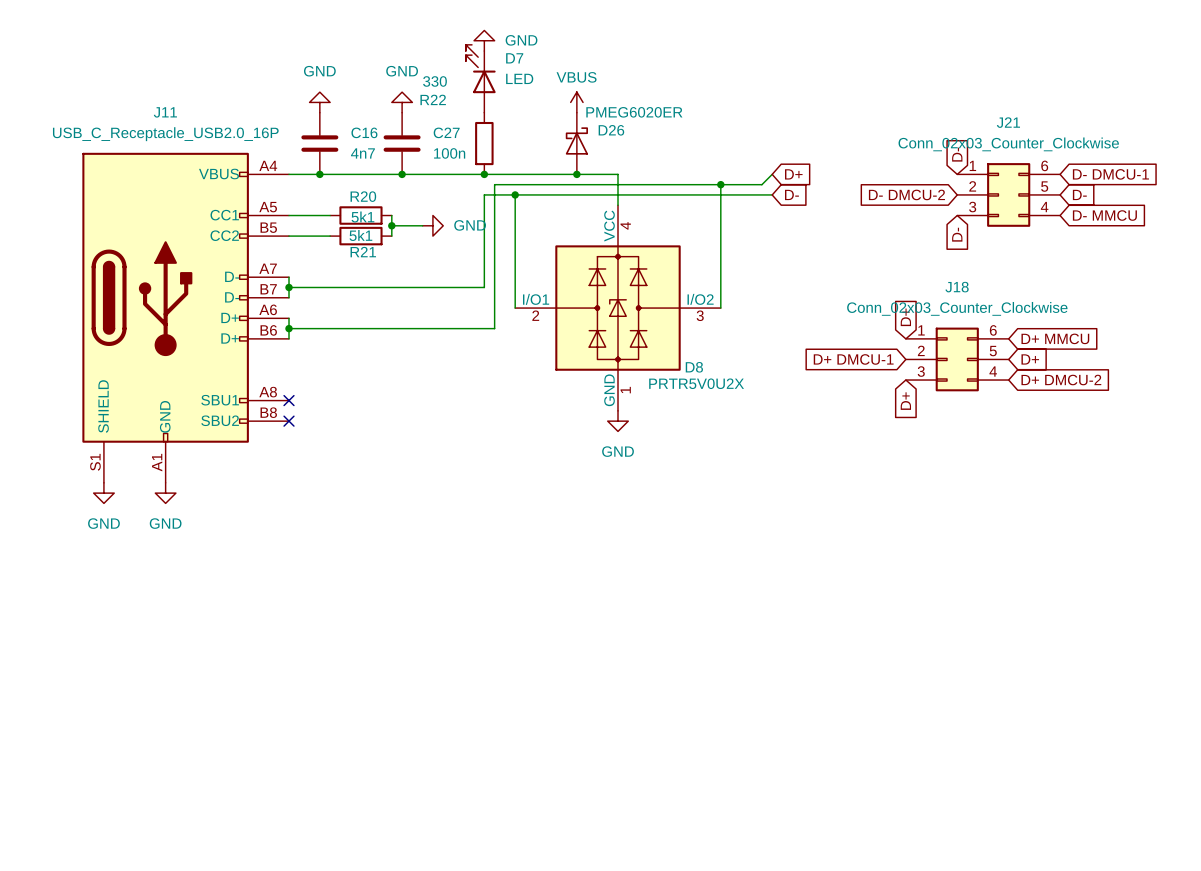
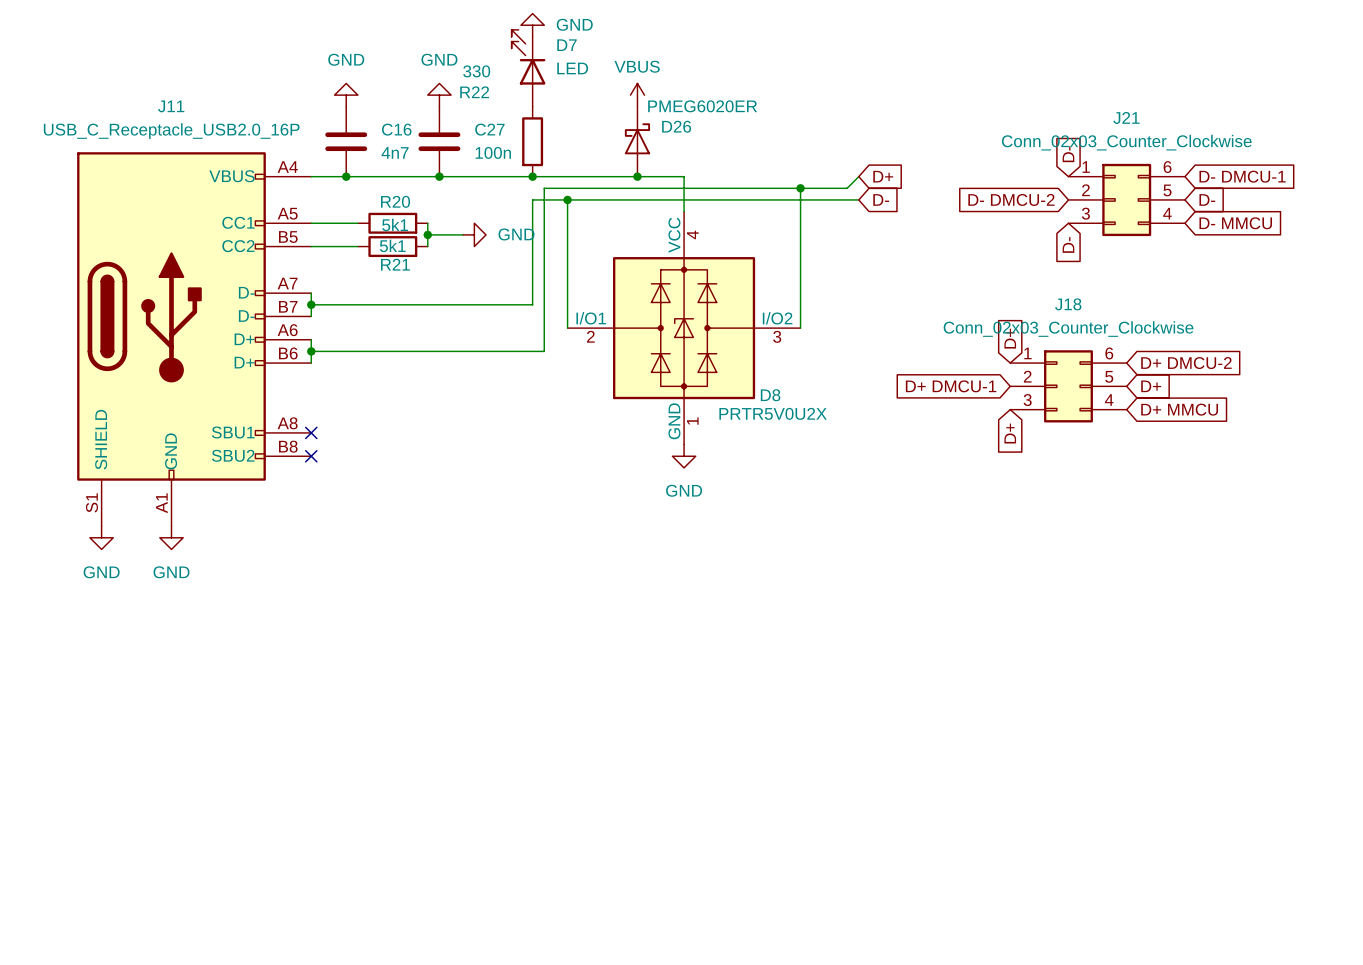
global label: D+ MMCU (1055, 338) -> D+ DMCU-2 (1186, 363)
global label: D+ DMCU-2 (1061, 380) -> D+ MMCU (1179, 409)

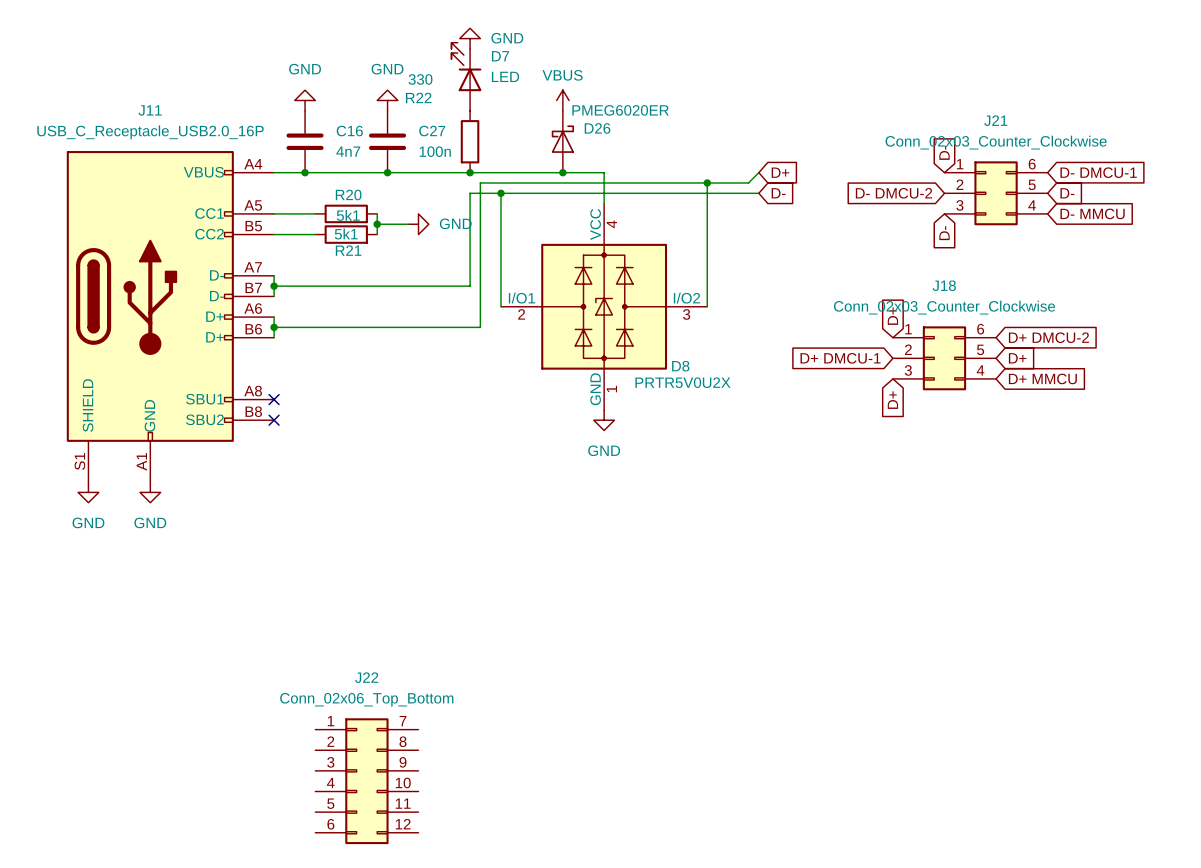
J22: none -> Conn_02x06_Top_Bottom (366, 781)

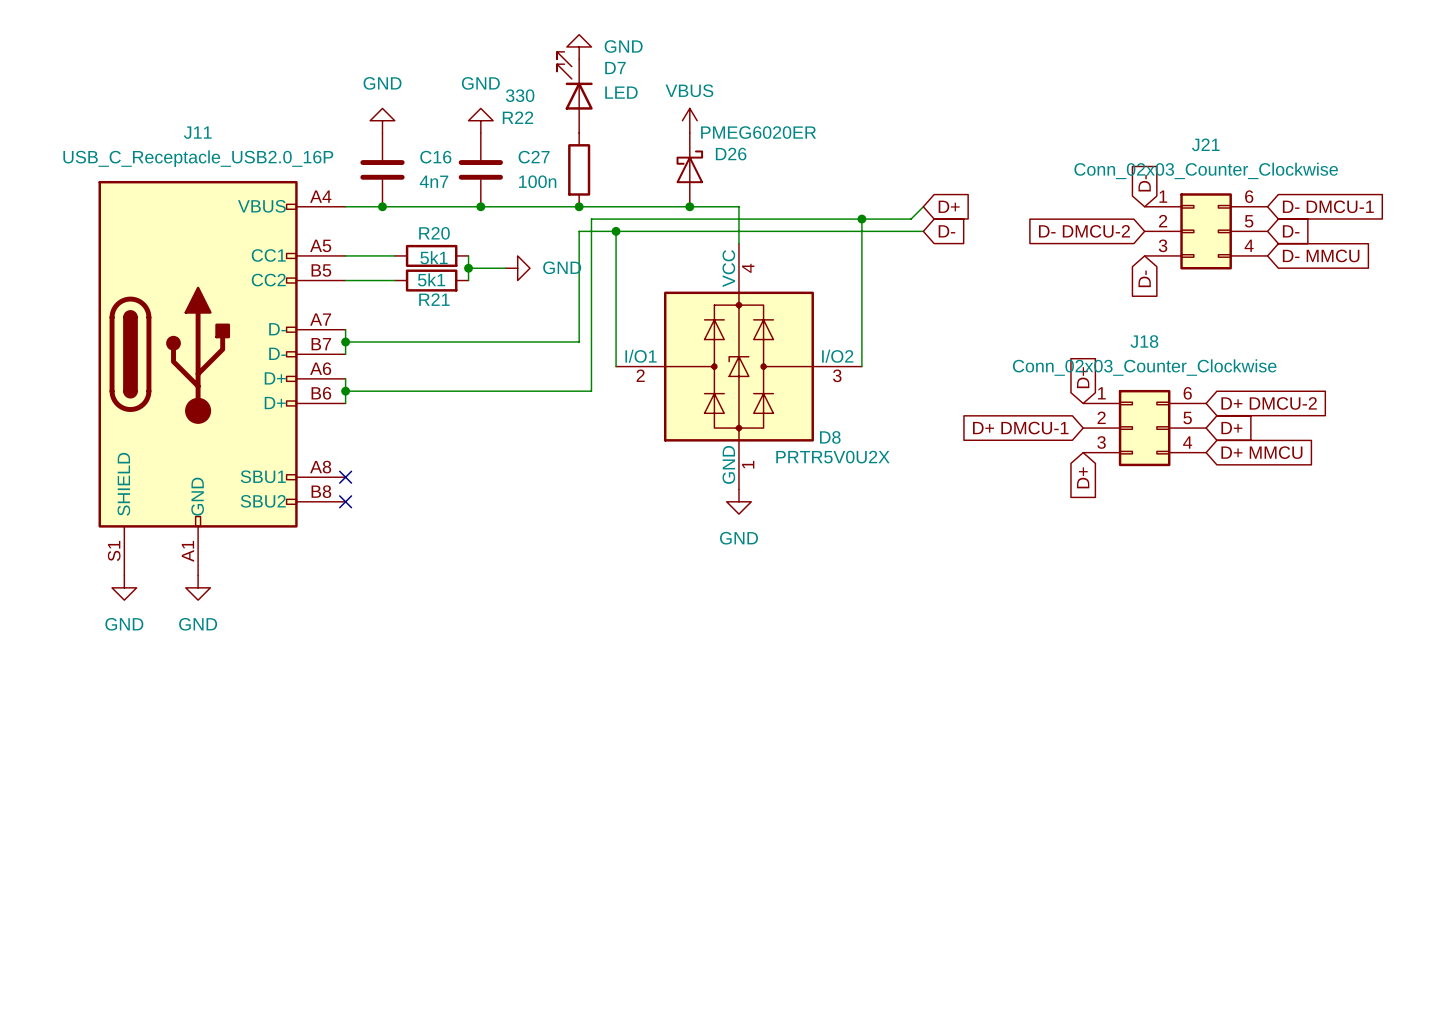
J22: Conn_02x06_Top_Bottom (366, 781) -> none

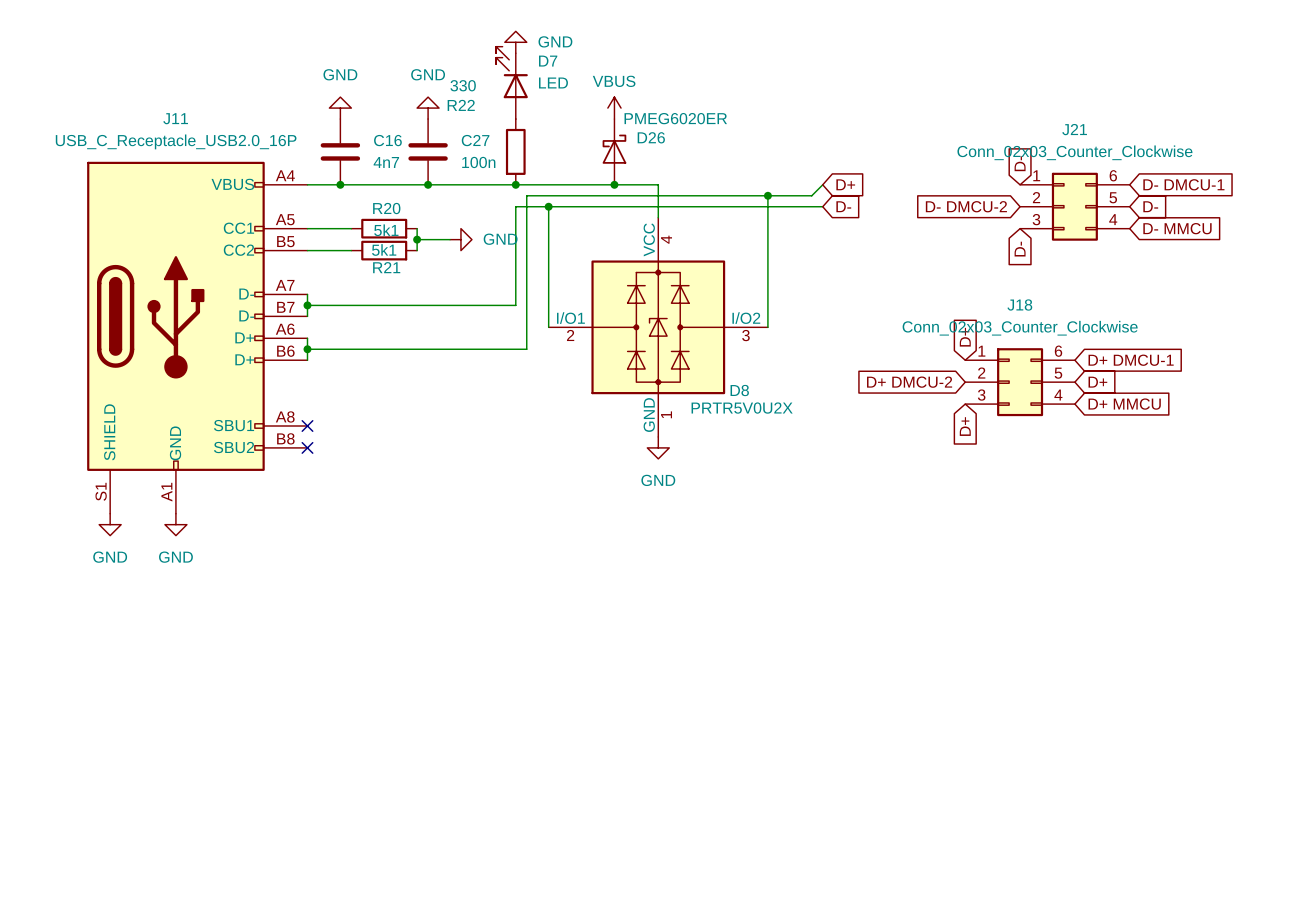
global label: D+ DMCU-2 (1269, 403) -> D+ DMCU-1 (1131, 360)
global label: D+ DMCU-1 (1020, 428) -> D+ DMCU-2 (909, 382)

